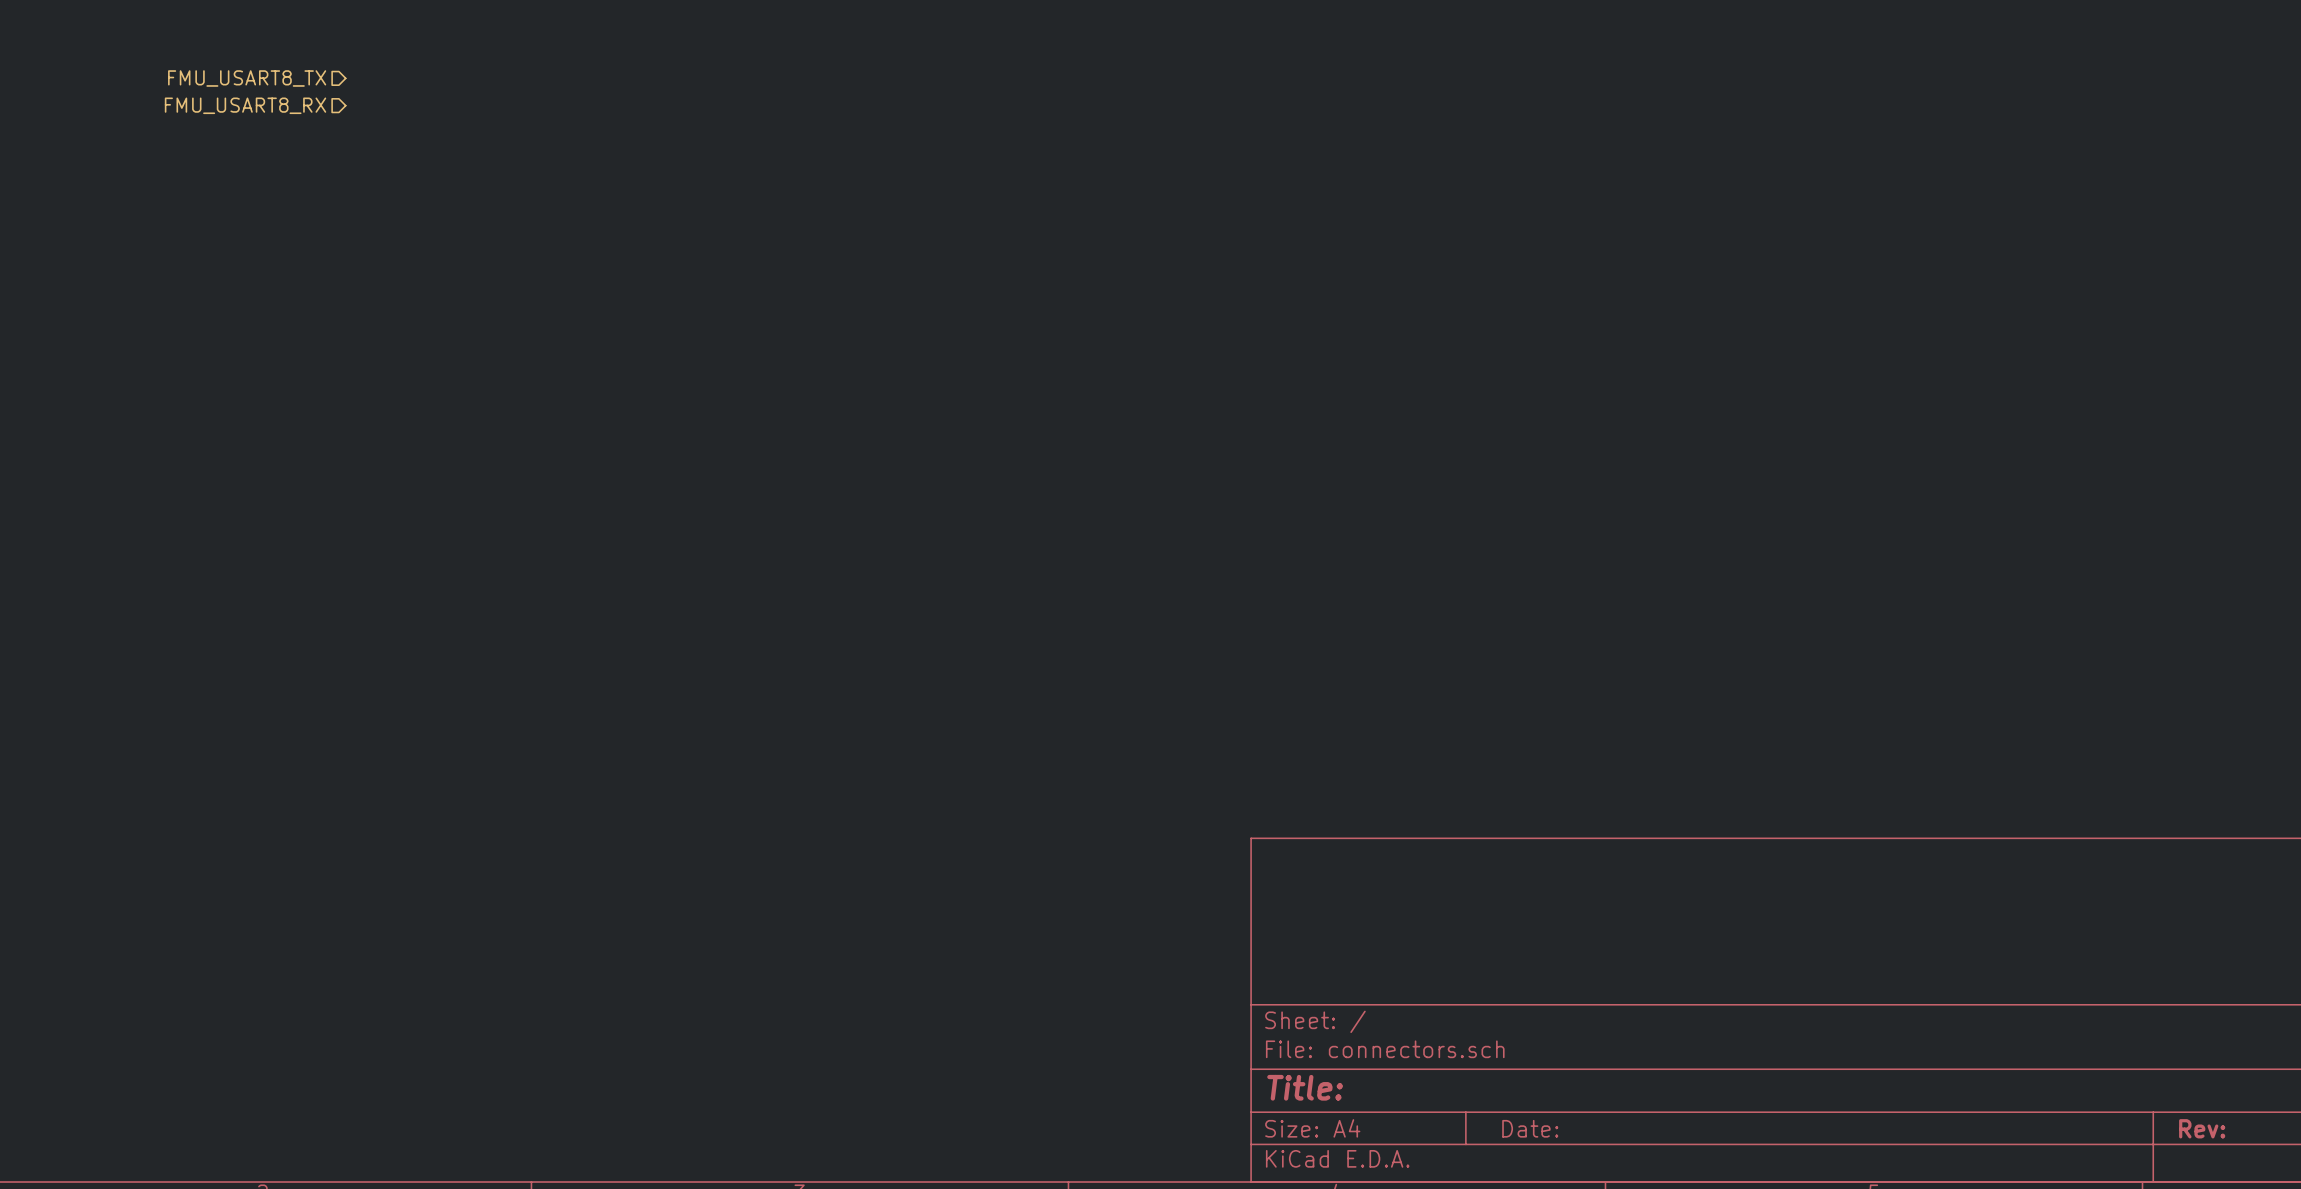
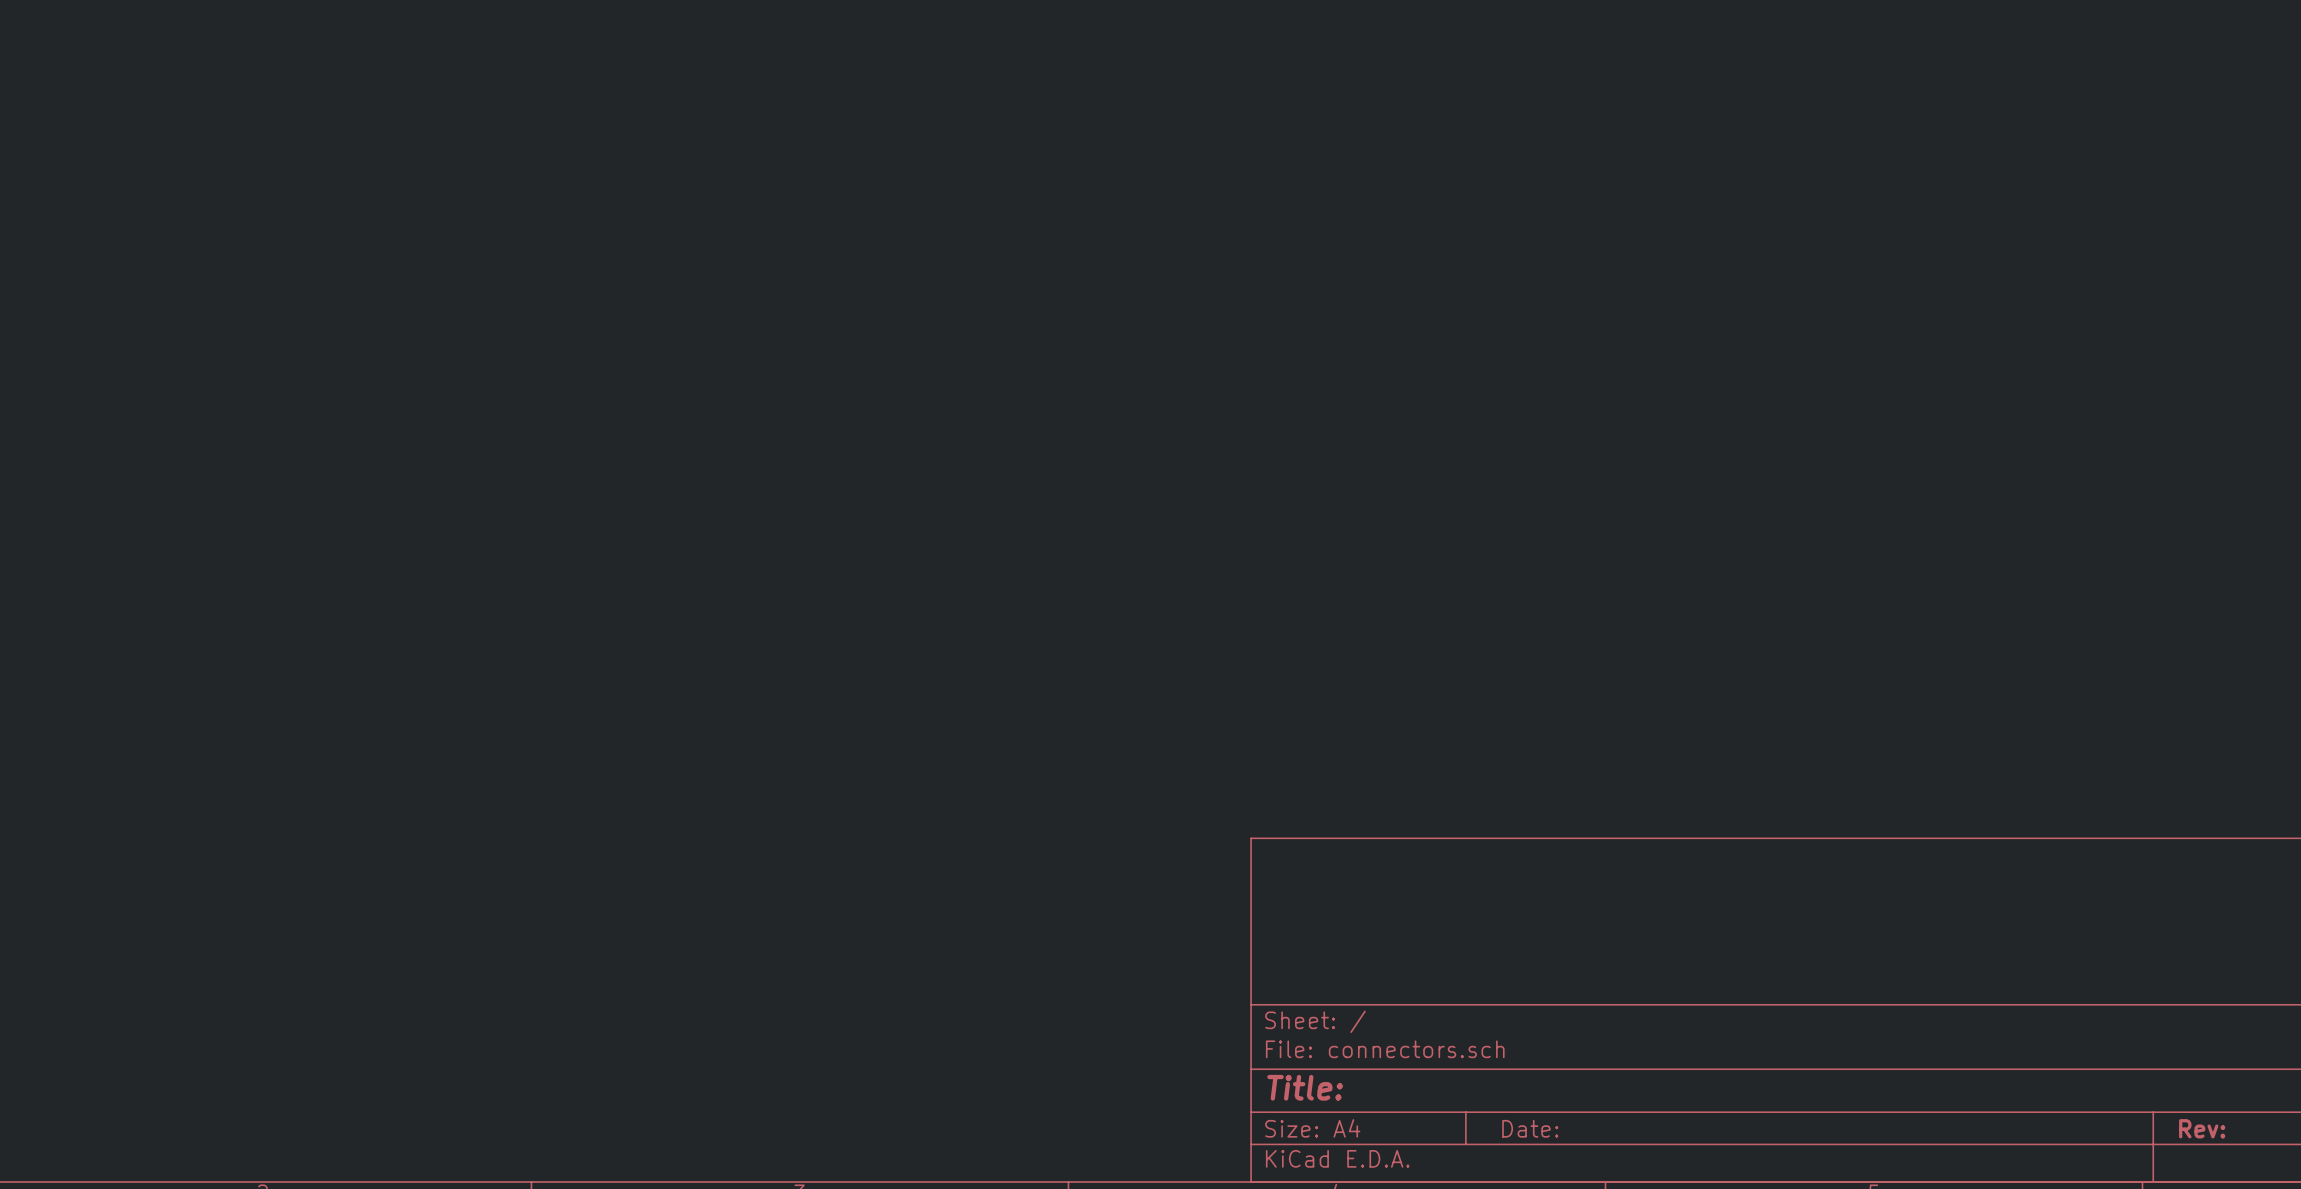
hierarchical label: FMU_USART8_TX (247, 78) -> none
hierarchical label: FMU_USART8_RX (245, 105) -> none

